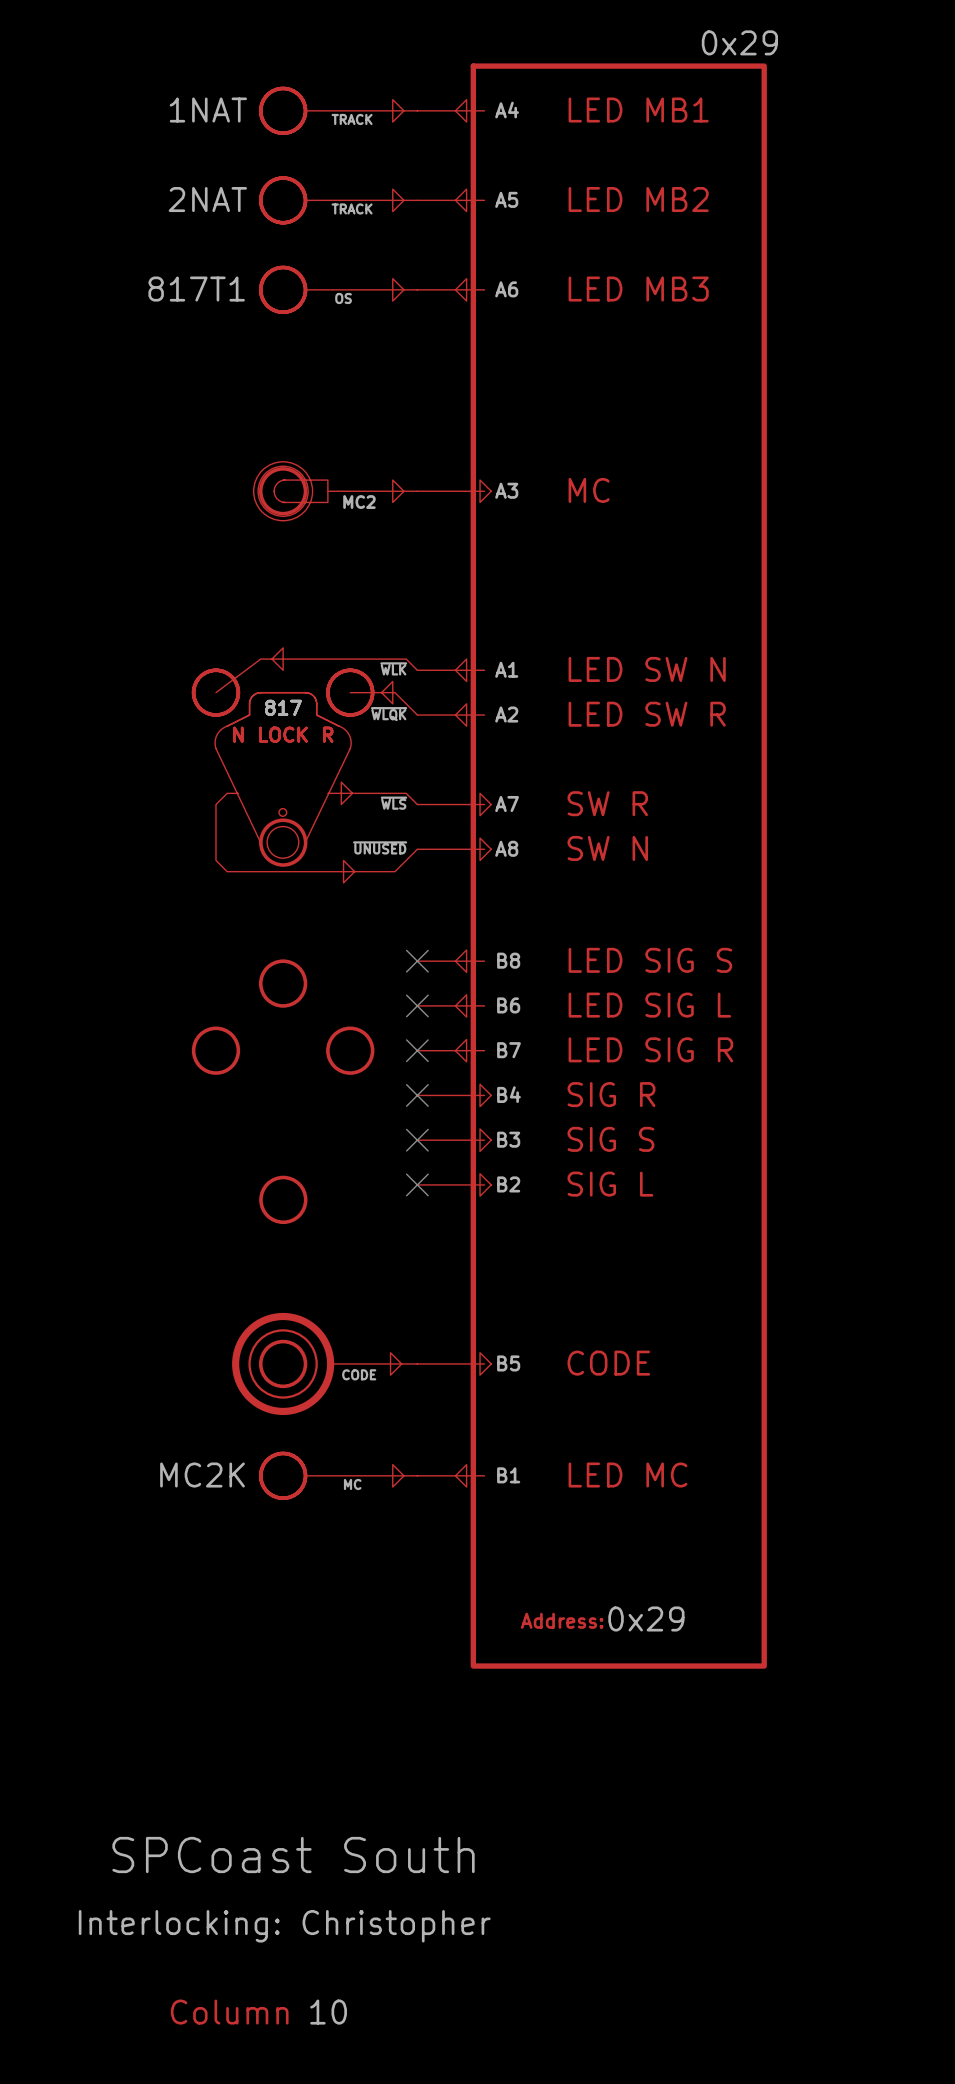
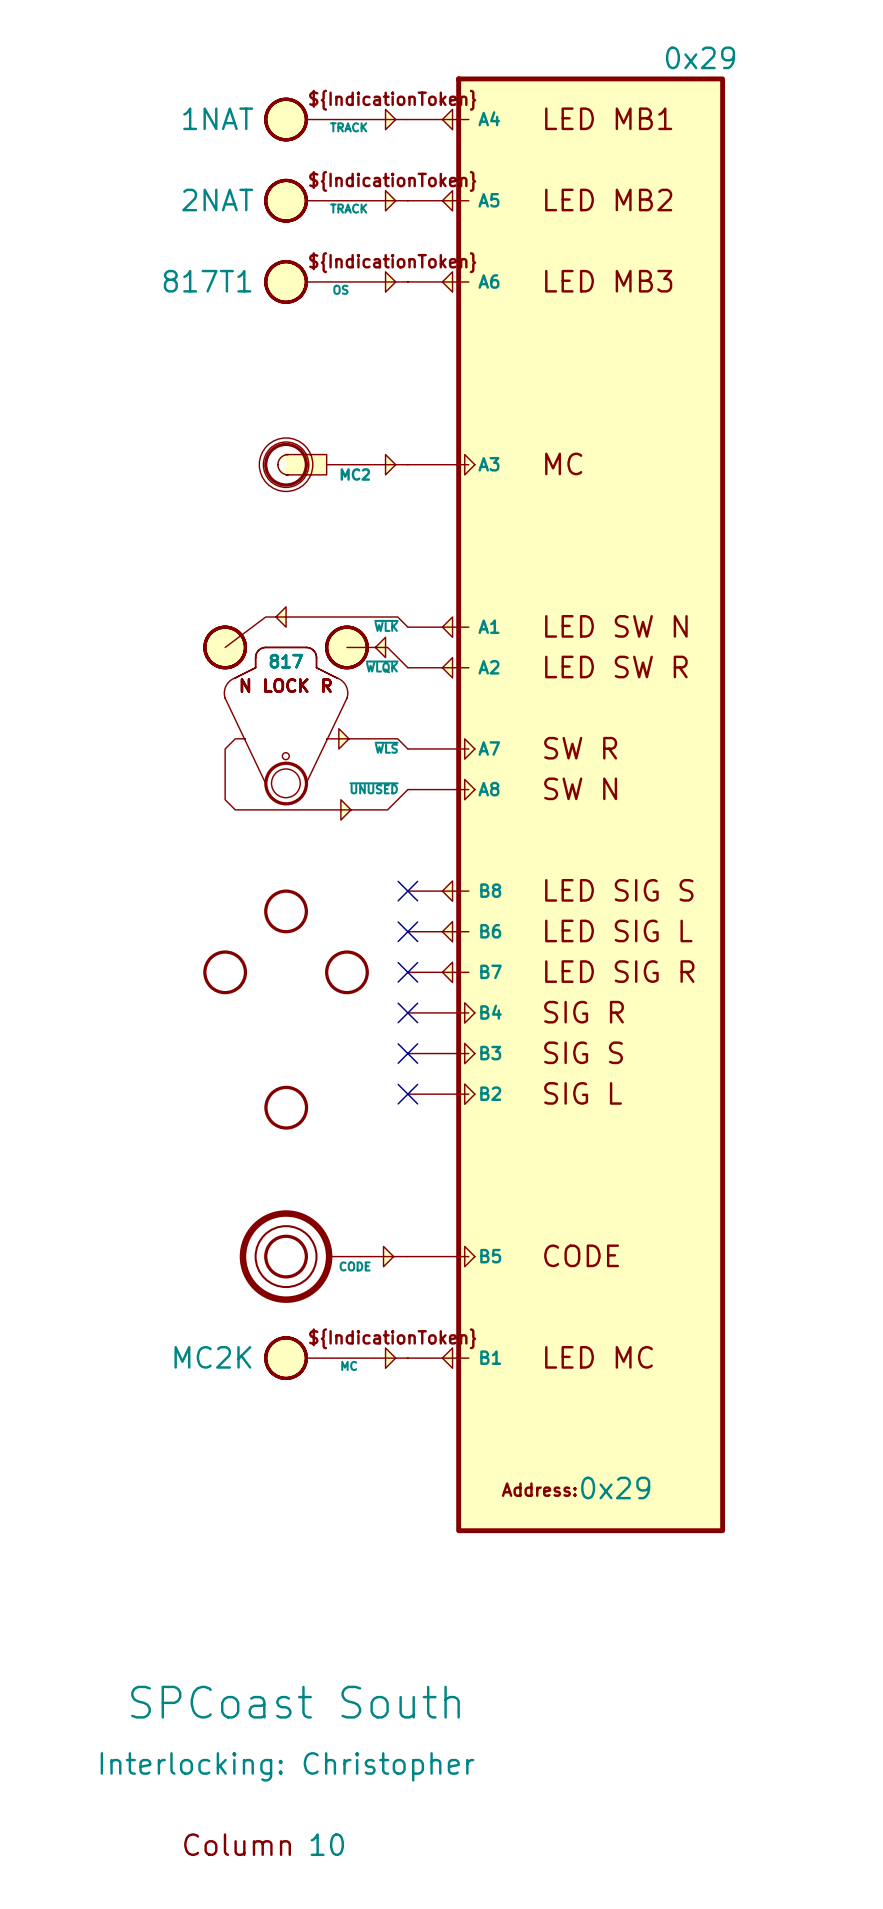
part symbol: [417, 63, 767, 1669] -> [407, 76, 726, 1534]
part text: none -> ${IndicationToken} (392, 100)
part text: none -> ${IndicationToken} (392, 181)
part text: none -> ${IndicationToken} (392, 262)
part text: none -> ${IndicationToken} (392, 1338)

